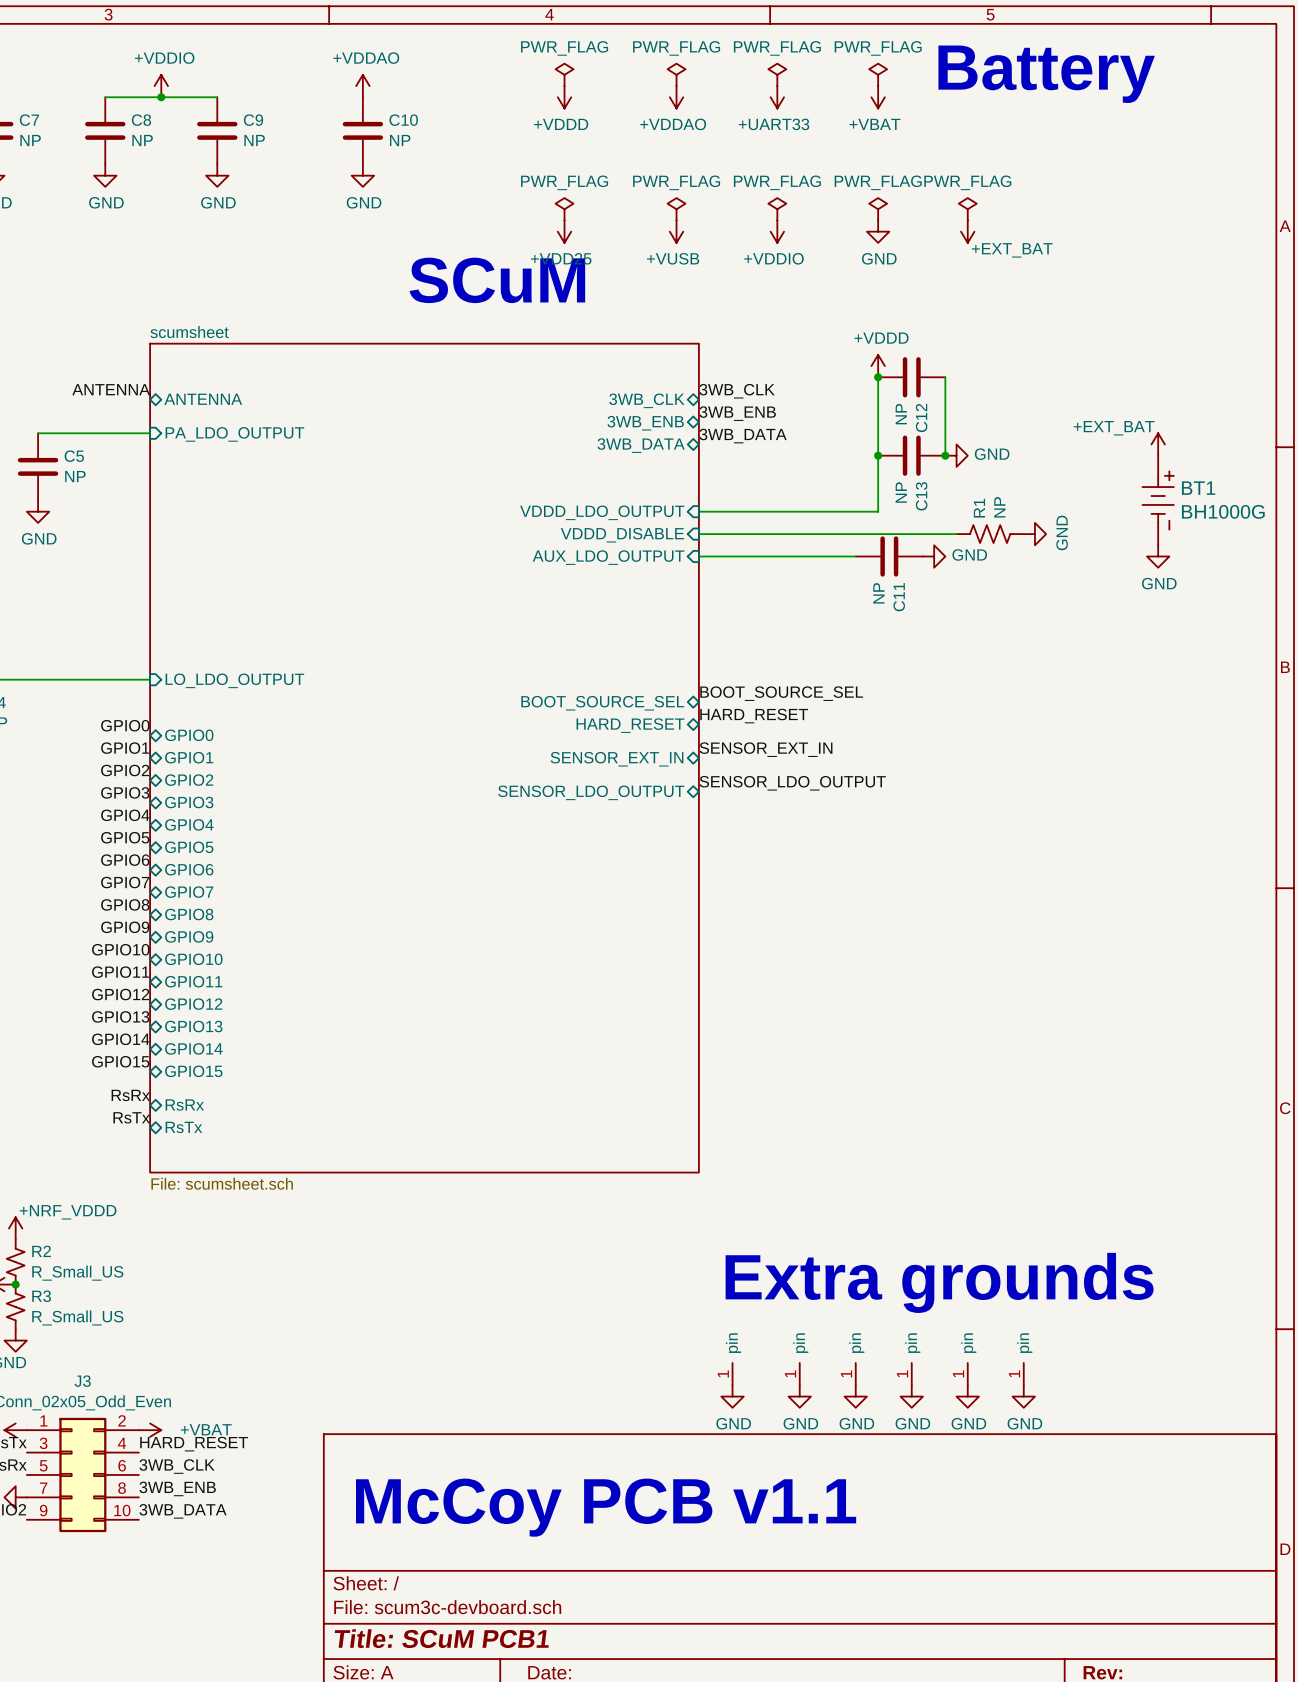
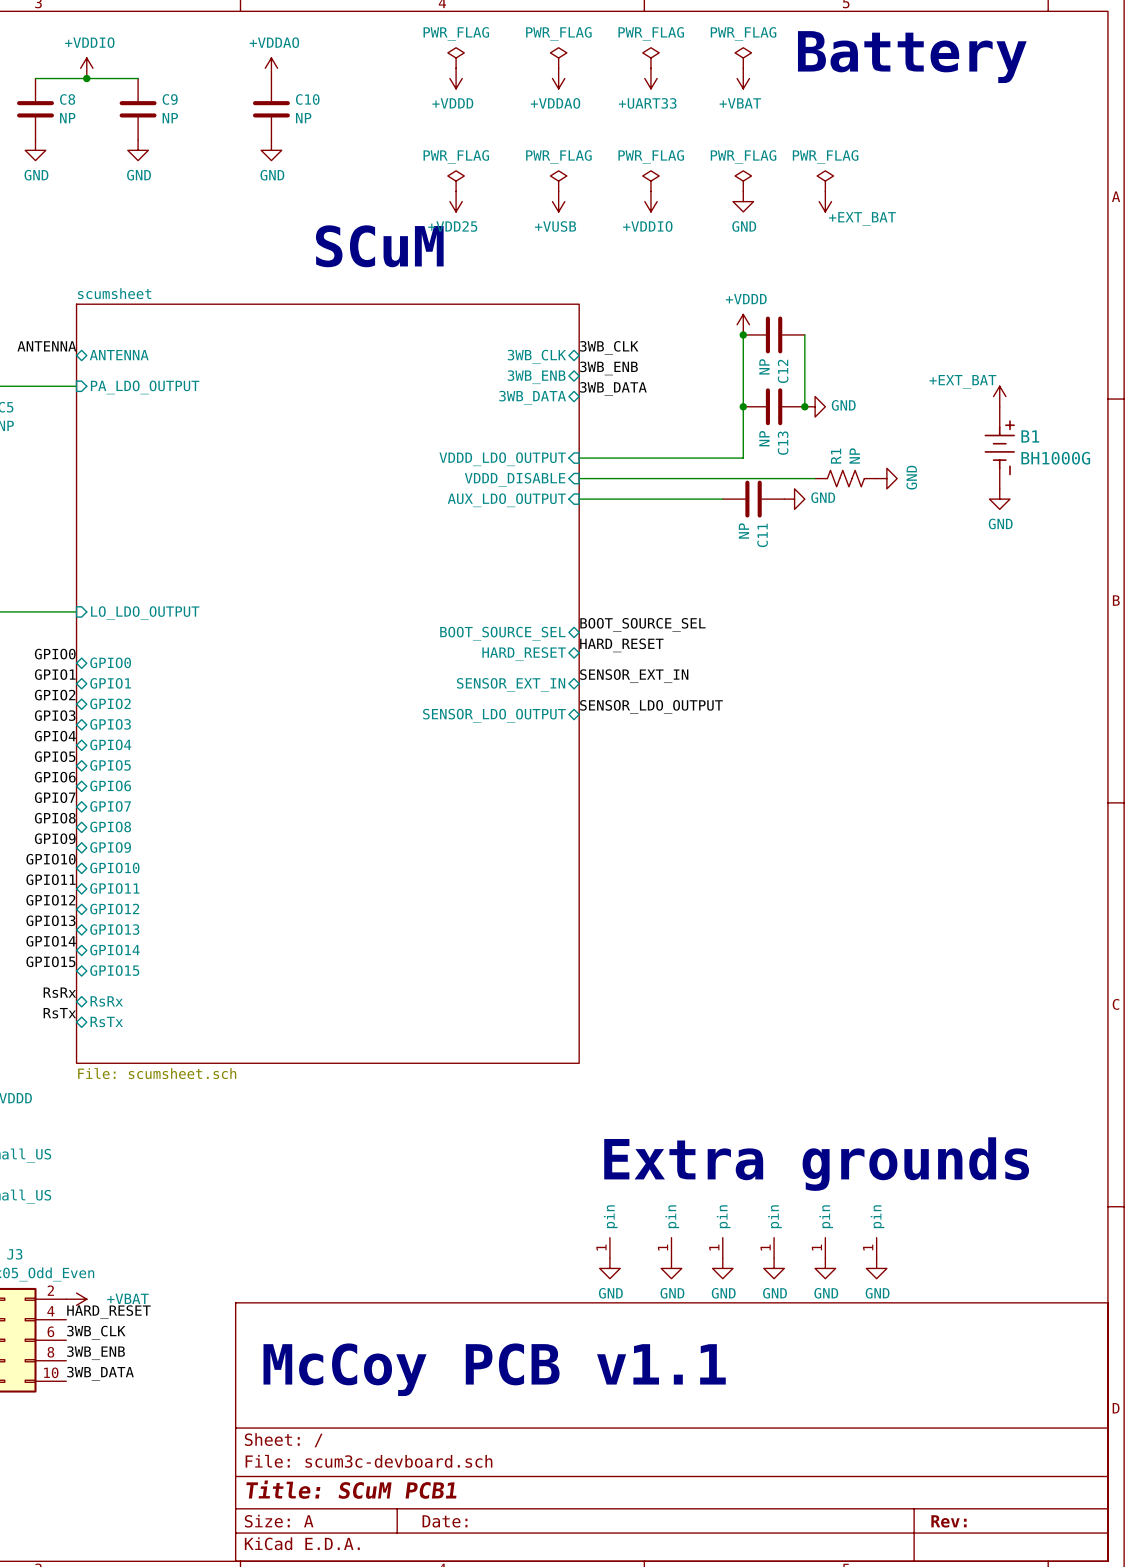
BT1 name: BT1 (1198, 488) -> B1 (1030, 436)

